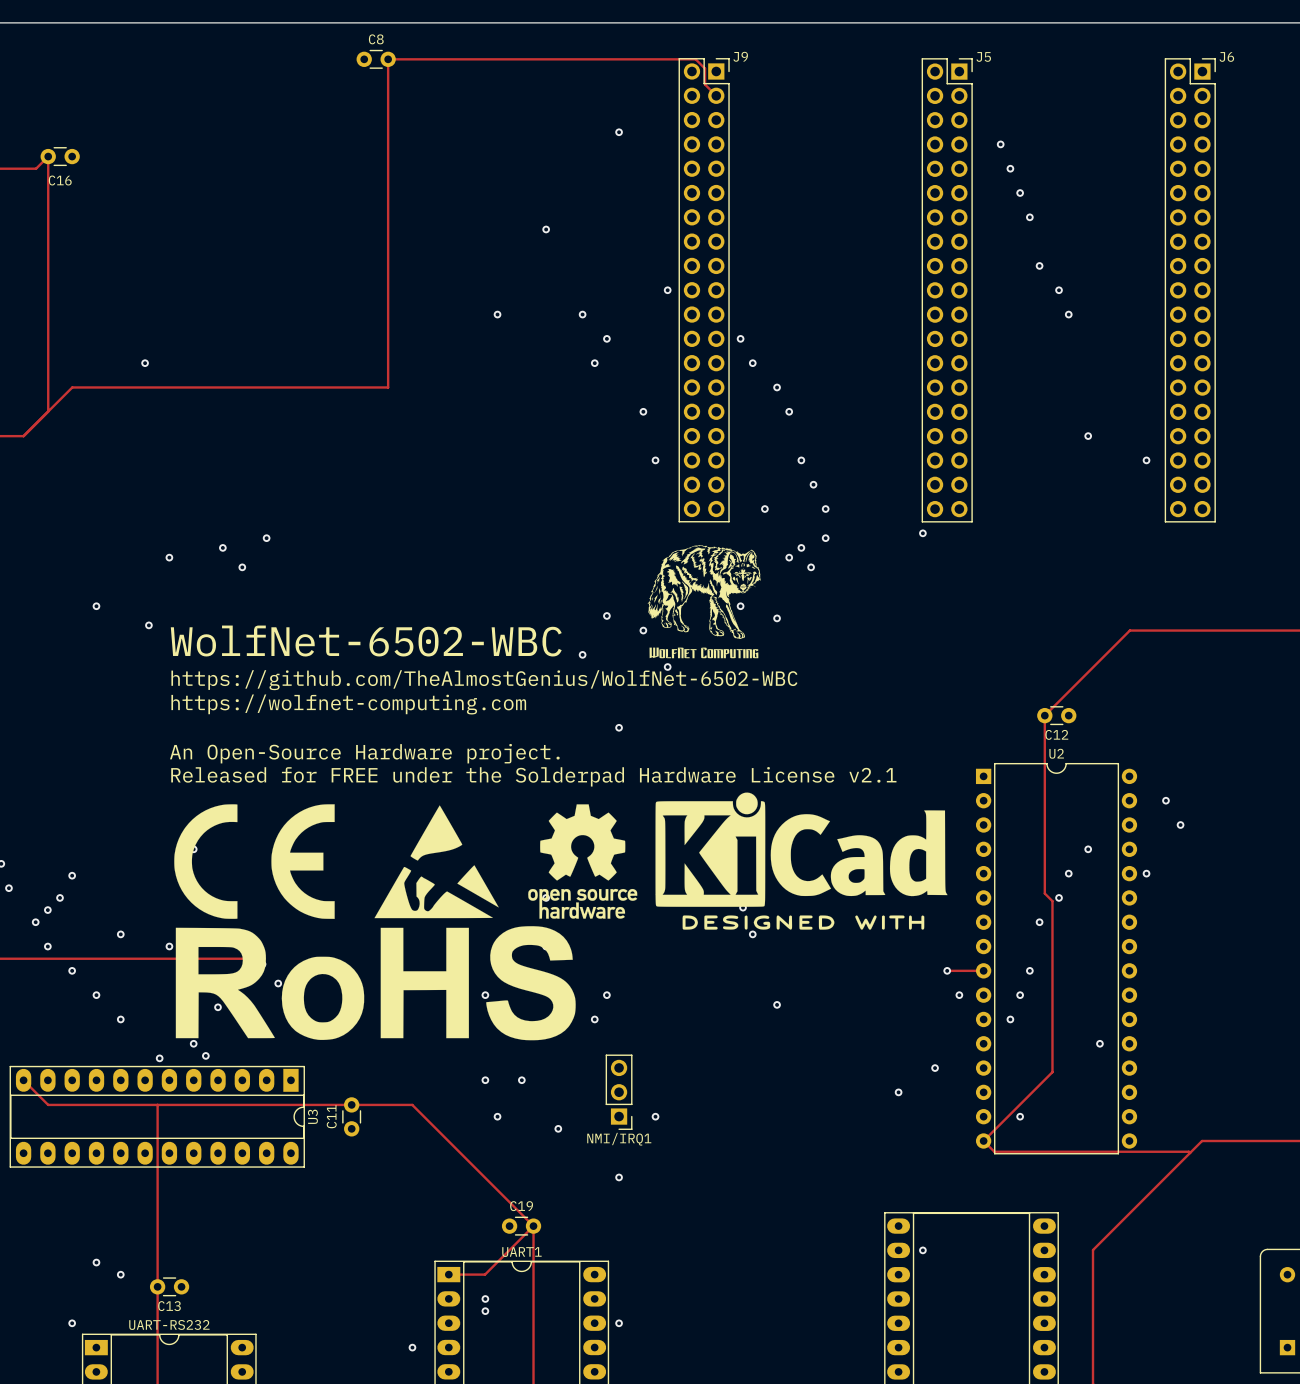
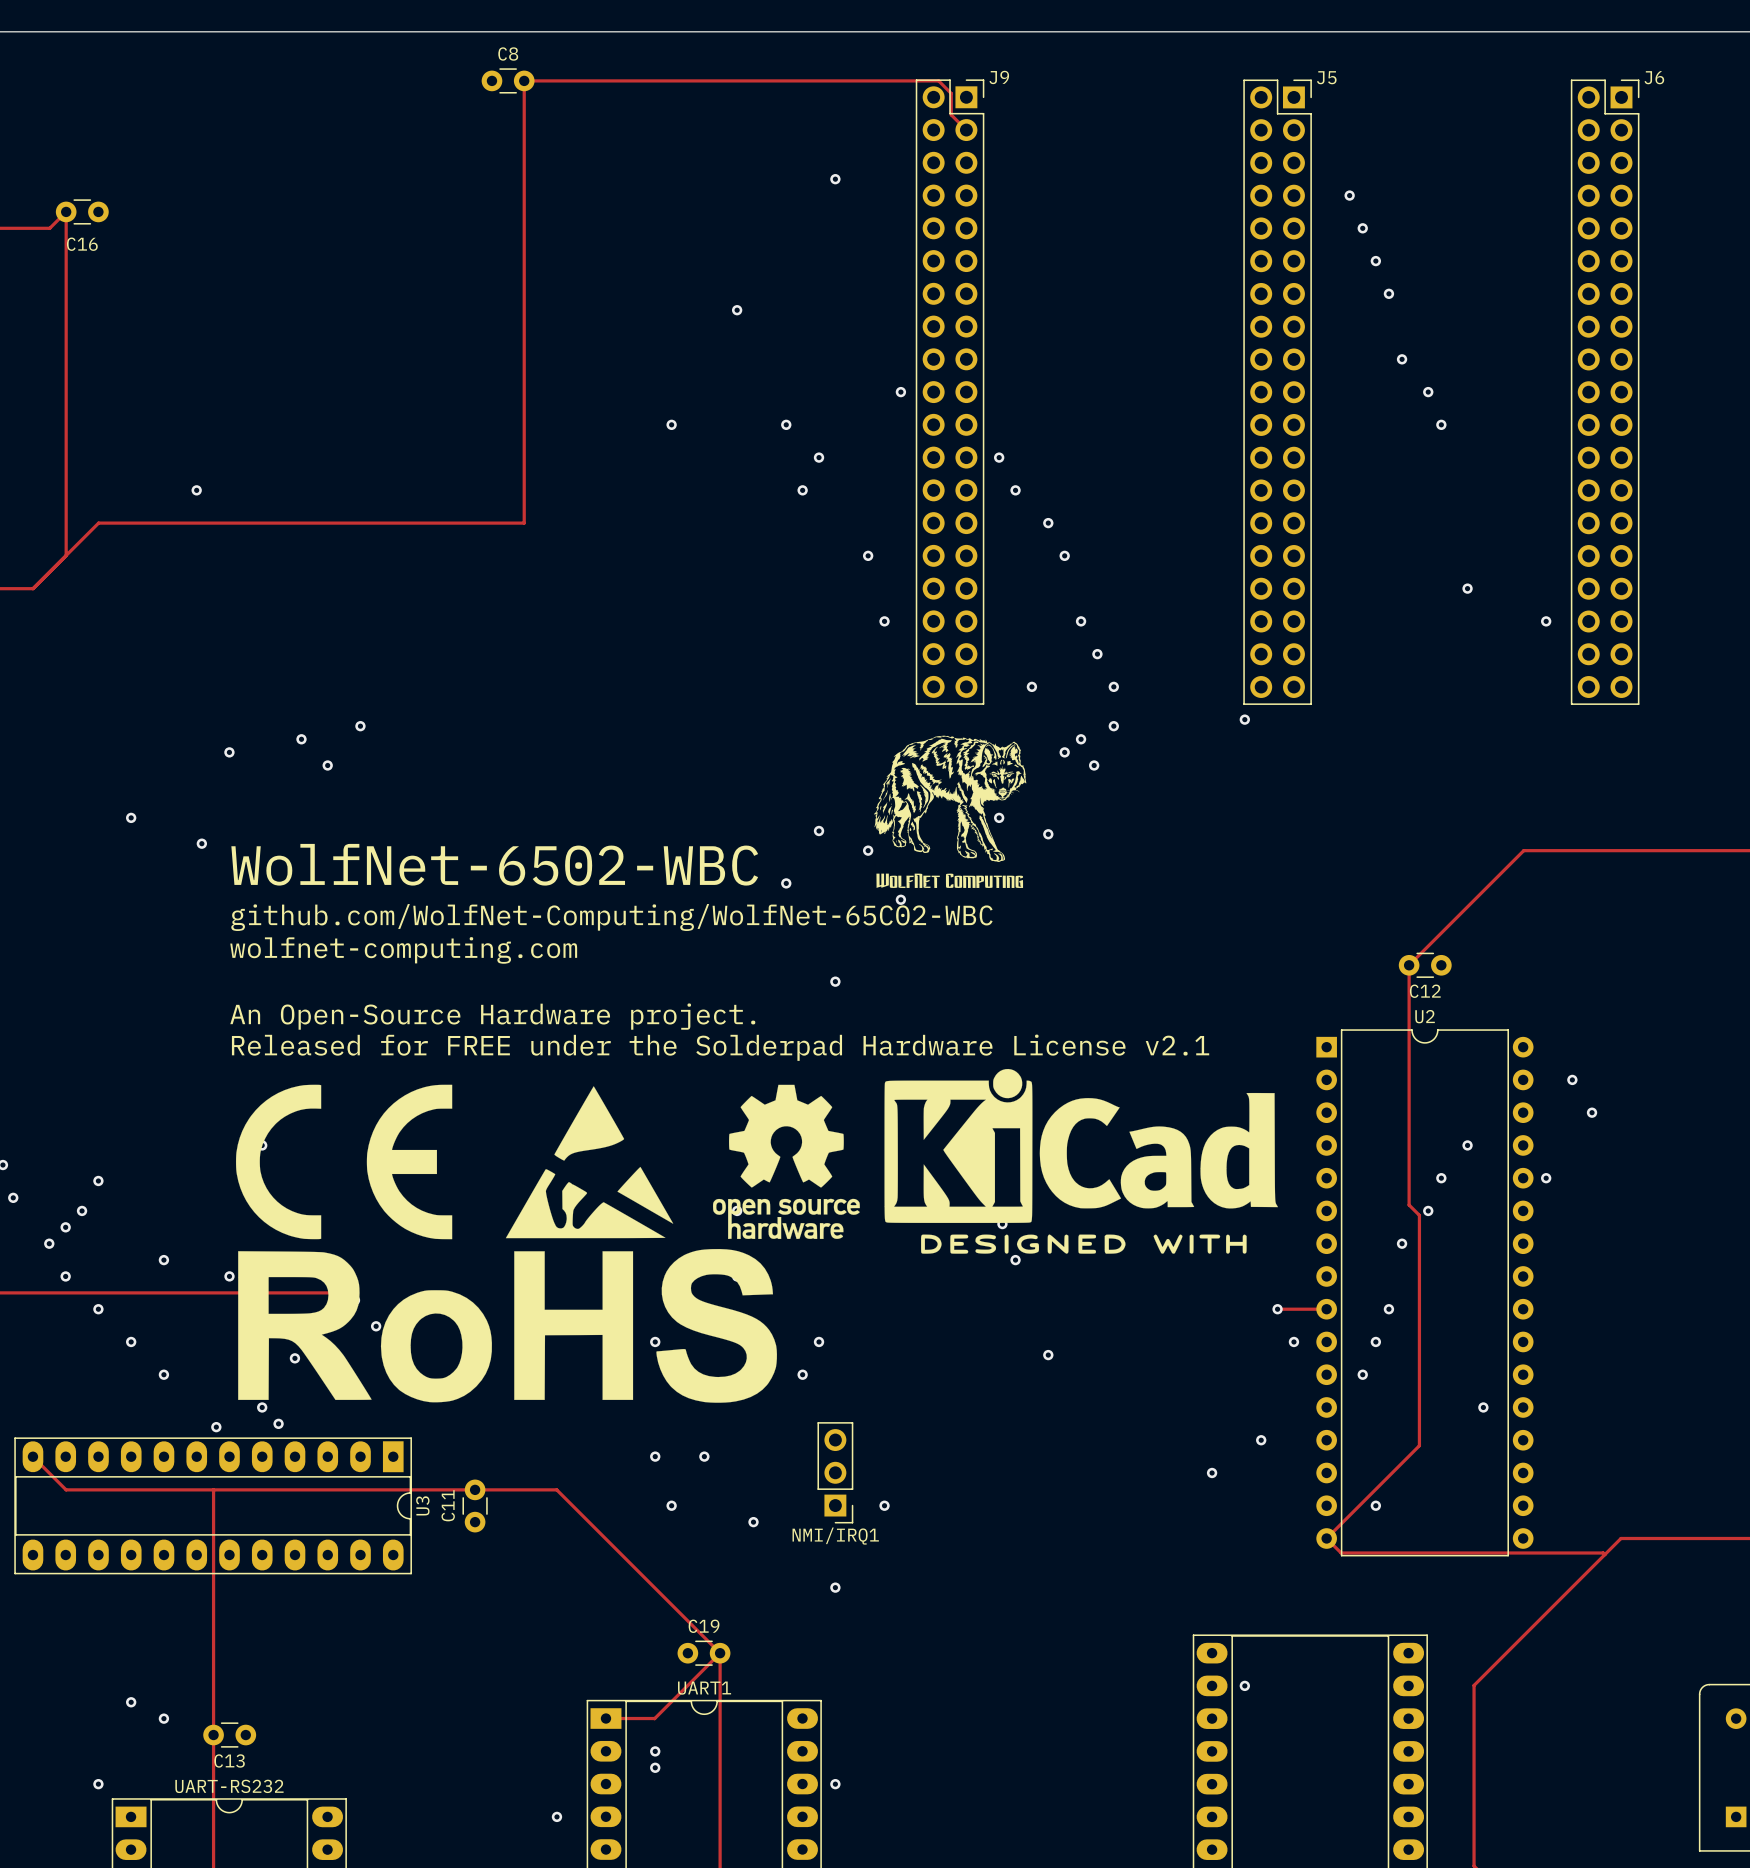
text: https://github.com/TheAlmostGenius/WolfNet-6502-WBC (484, 680) -> github.com/WolfNet-Computing/WolfNet-65C02-WBC (611, 917)
text: https://wolfnet-computing.com (348, 704) -> wolfnet-computing.com (403, 950)

